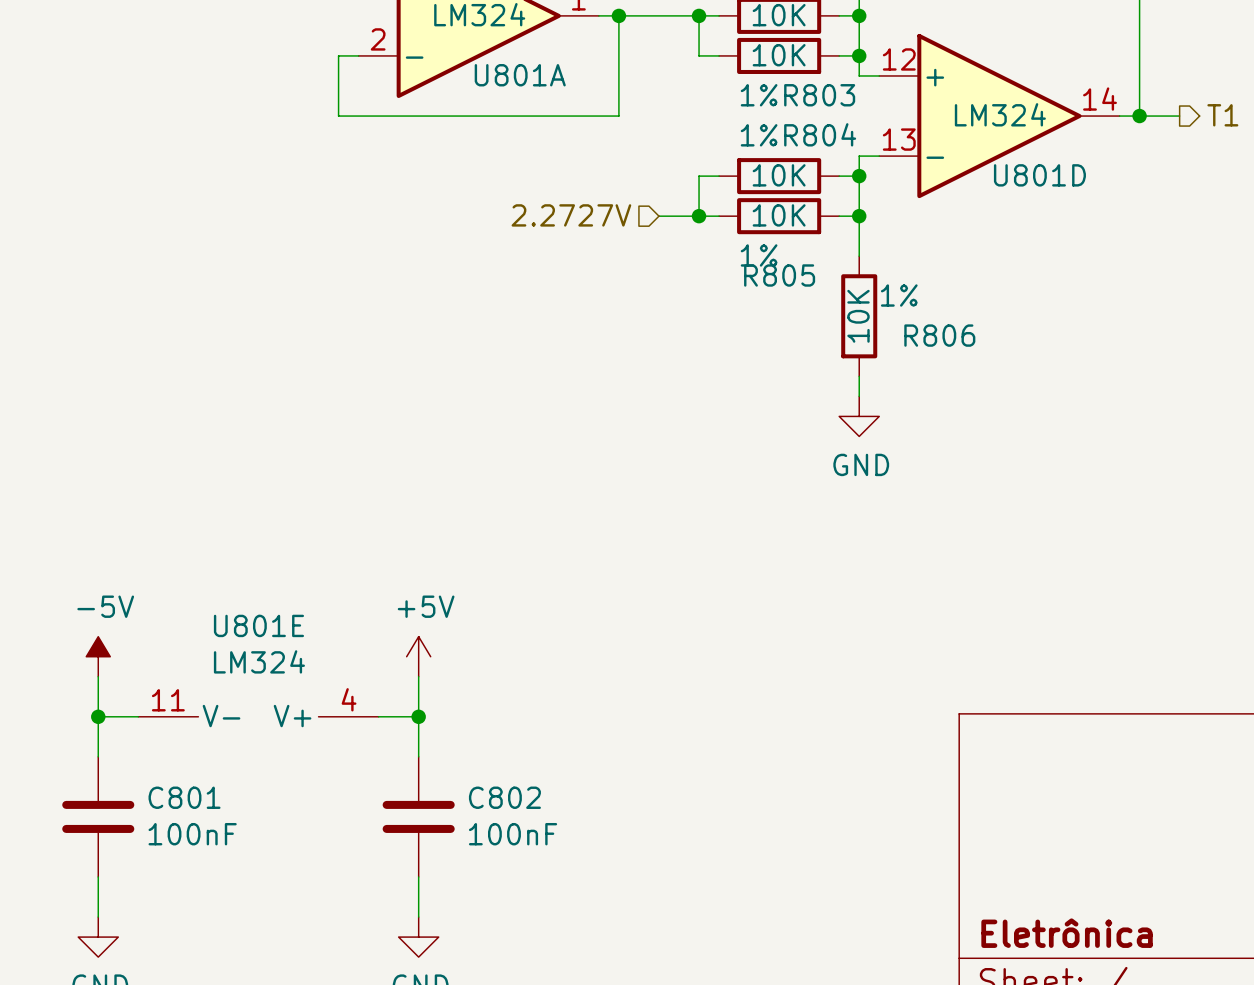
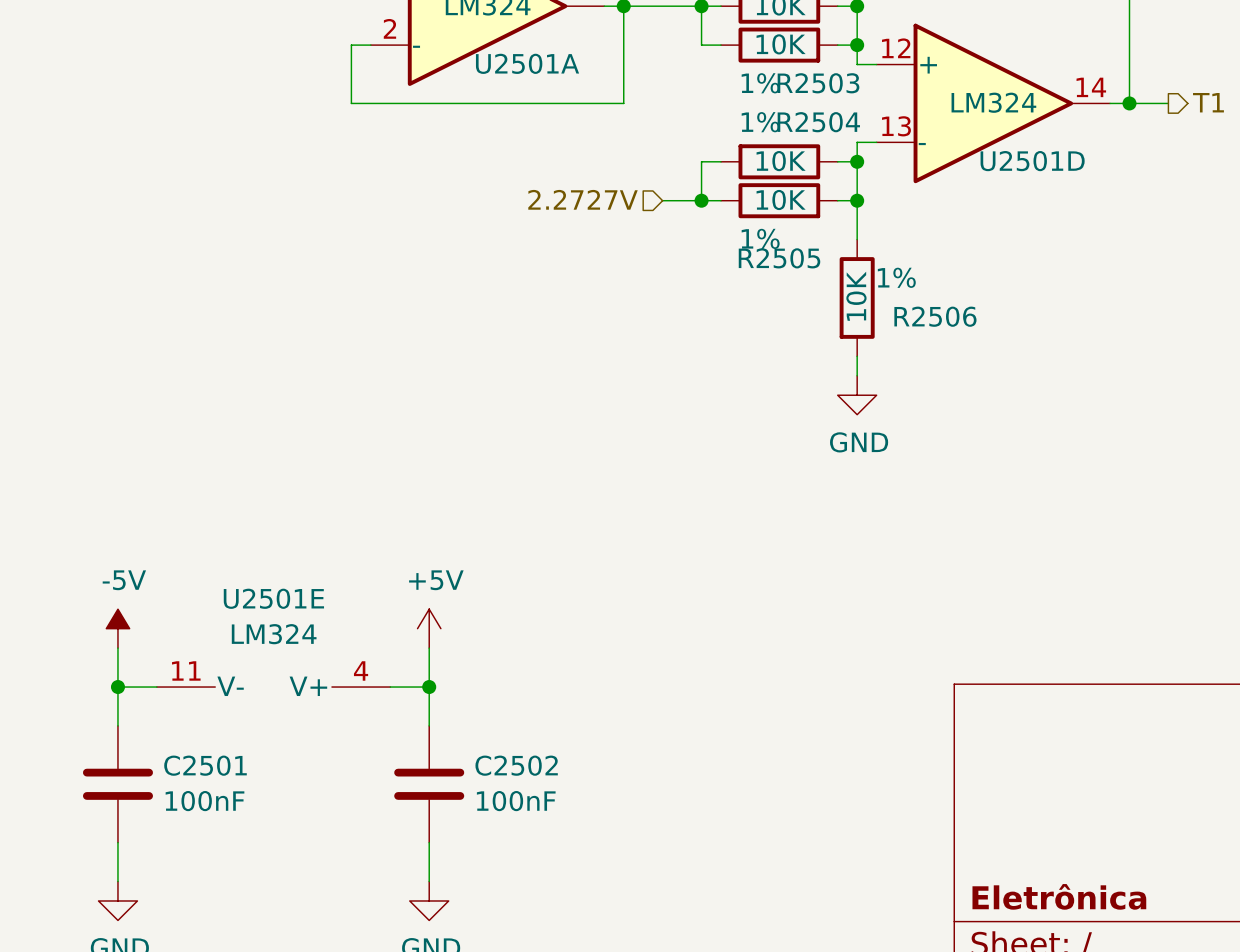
U801A name: U801A (520, 75) -> U2501A (527, 63)
R803 name: R803 (819, 95) -> R2503 (818, 83)
R804 name: R804 (820, 134) -> R2504 (818, 122)
U801D name: U801D (1039, 175) -> U2501D (1032, 161)
R805 name: R805 (779, 275) -> R2505 (779, 258)
R806 name: R806 (939, 335) -> R2506 (935, 316)
U801E name: U801E (258, 625) -> U2501E (273, 598)
C801 name: C801 (184, 797) -> C2501 (205, 765)
C802 name: C802 (504, 797) -> C2502 (516, 765)

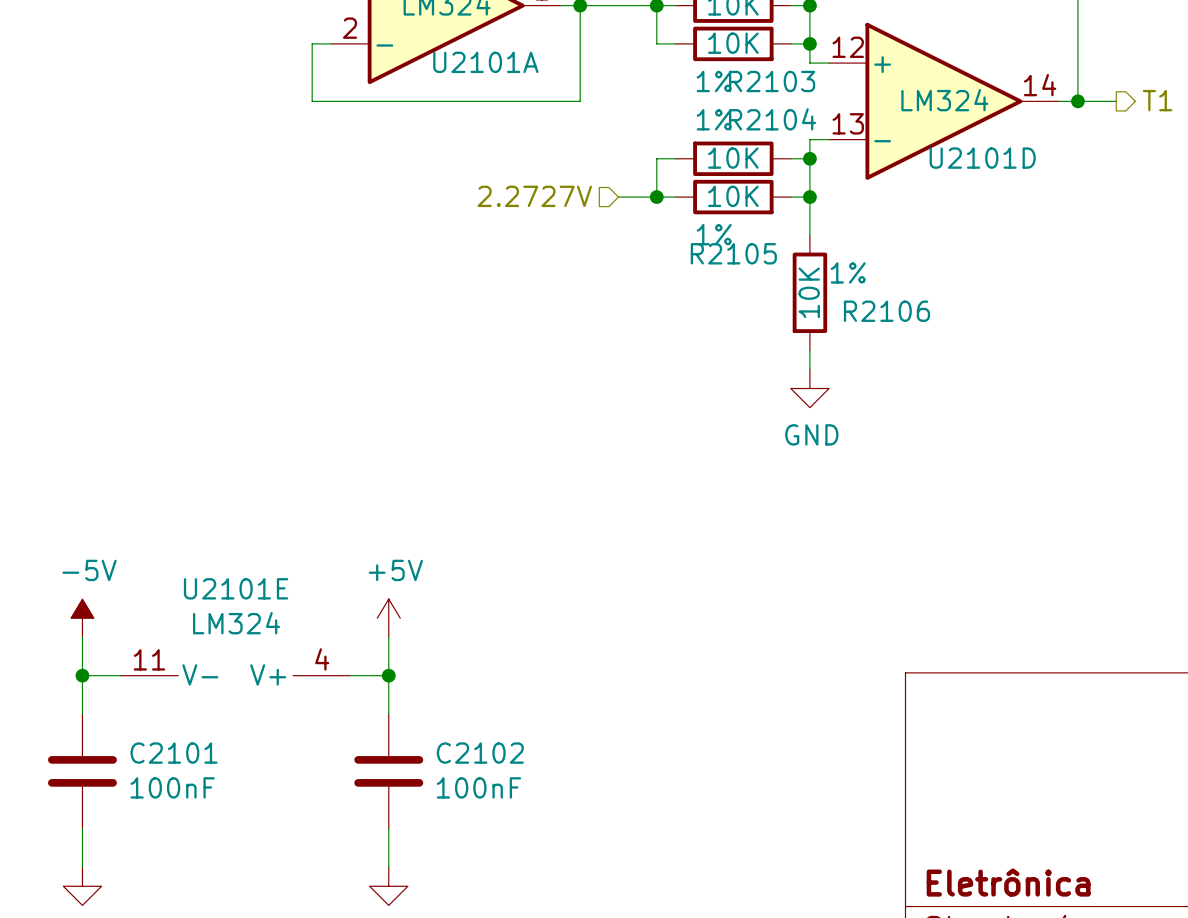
U2501A name: U2501A (527, 63) -> U2101A (485, 62)
R2503 name: R2503 (818, 83) -> R2103 (772, 81)
R2504 name: R2504 (818, 122) -> R2104 (772, 119)
U2501D name: U2501D (1032, 161) -> U2101D (982, 158)
R2505 name: R2505 (779, 258) -> R2105 (733, 253)
R2506 name: R2506 (935, 316) -> R2106 (886, 311)
U2501E name: U2501E (273, 598) -> U2101E (236, 588)
C2501 name: C2501 (205, 765) -> C2101 (174, 753)
C2502 name: C2502 (516, 765) -> C2102 (480, 753)

